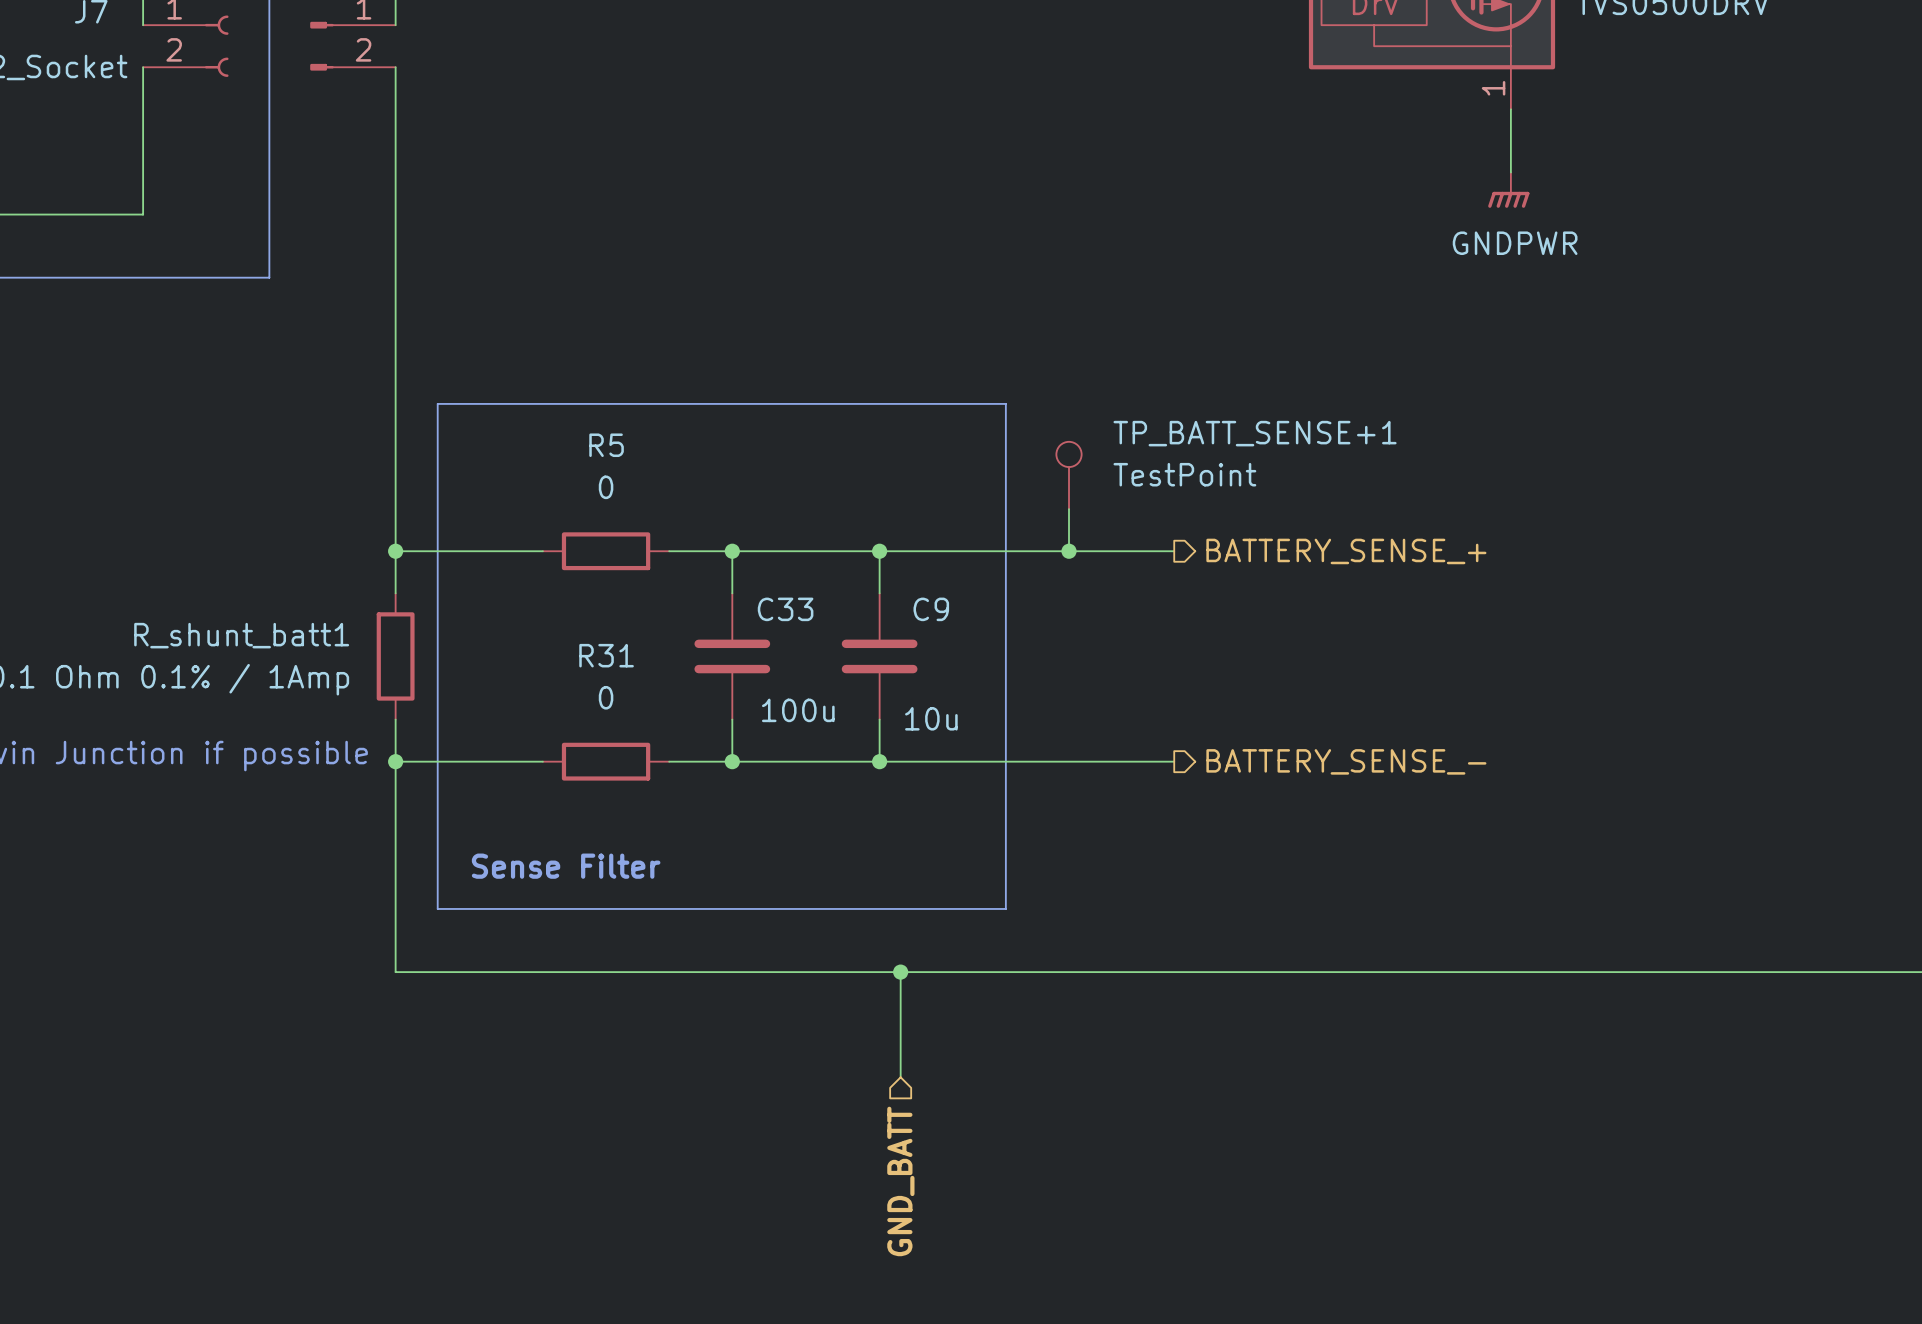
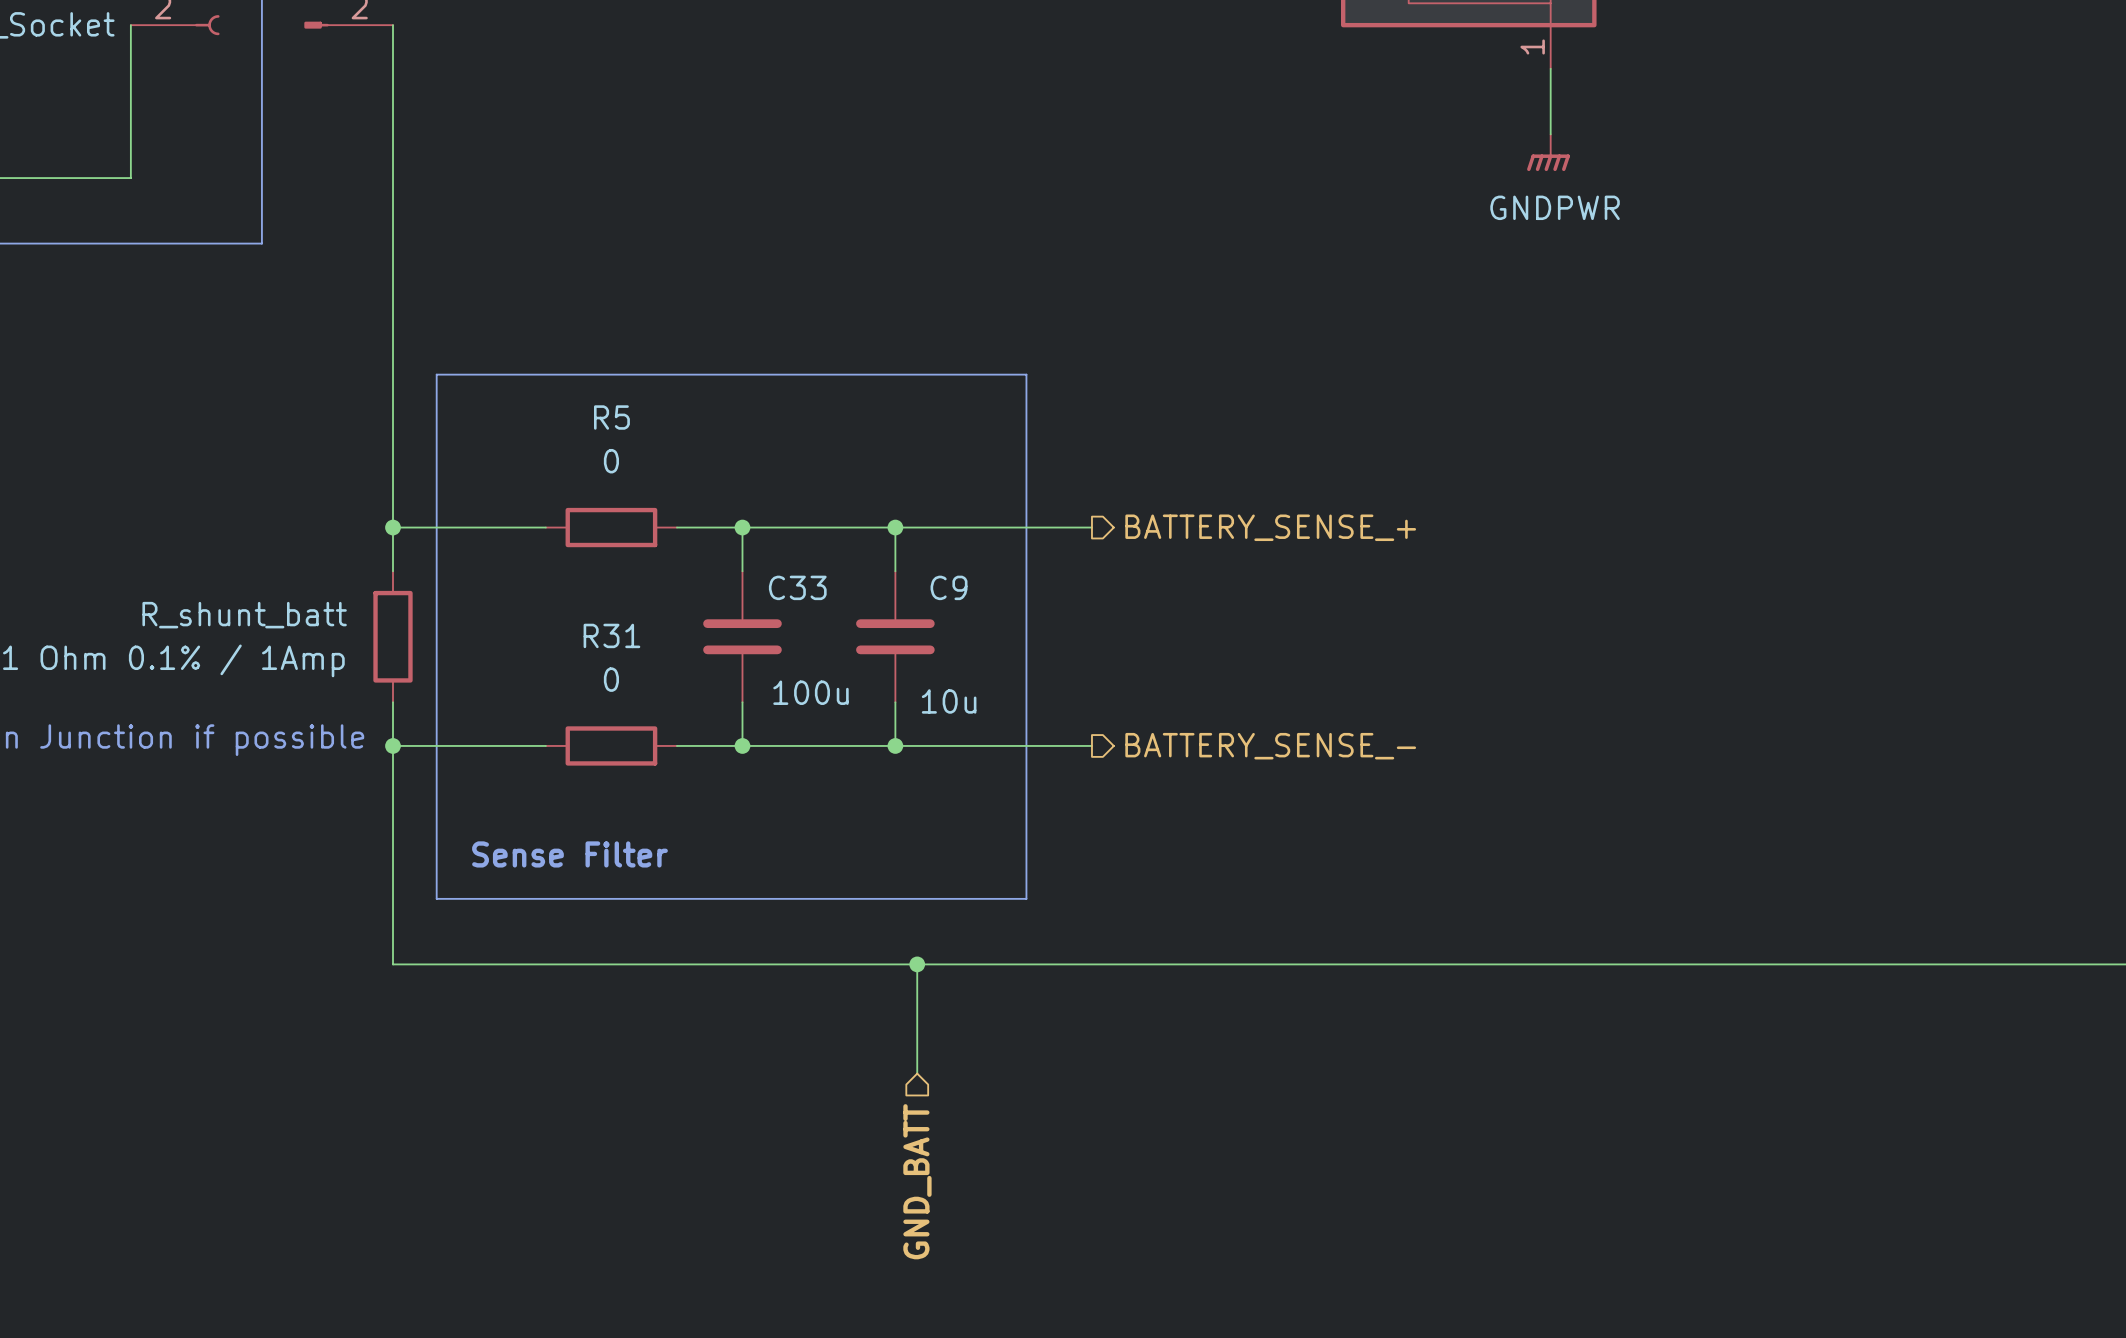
TP_BATT_SENSE+1: TestPoint (1069, 475) -> none
wire: (1069, 509) (1069, 551) (1174, 551) -> none
junction: (1069, 551) -> none
hierarchical label position: BATTERY_SENSE_+ (1346, 551) -> BATTERY_SENSE_+ (1270, 527)
R_shunt_batt1 name: R_shunt_batt1 (241, 635) -> R_shunt_batt (244, 615)
wire: (1069, 761) (1174, 761) -> none
hierarchical label position: BATTERY_SENSE_- (1346, 761) -> BATTERY_SENSE_- (1270, 746)

